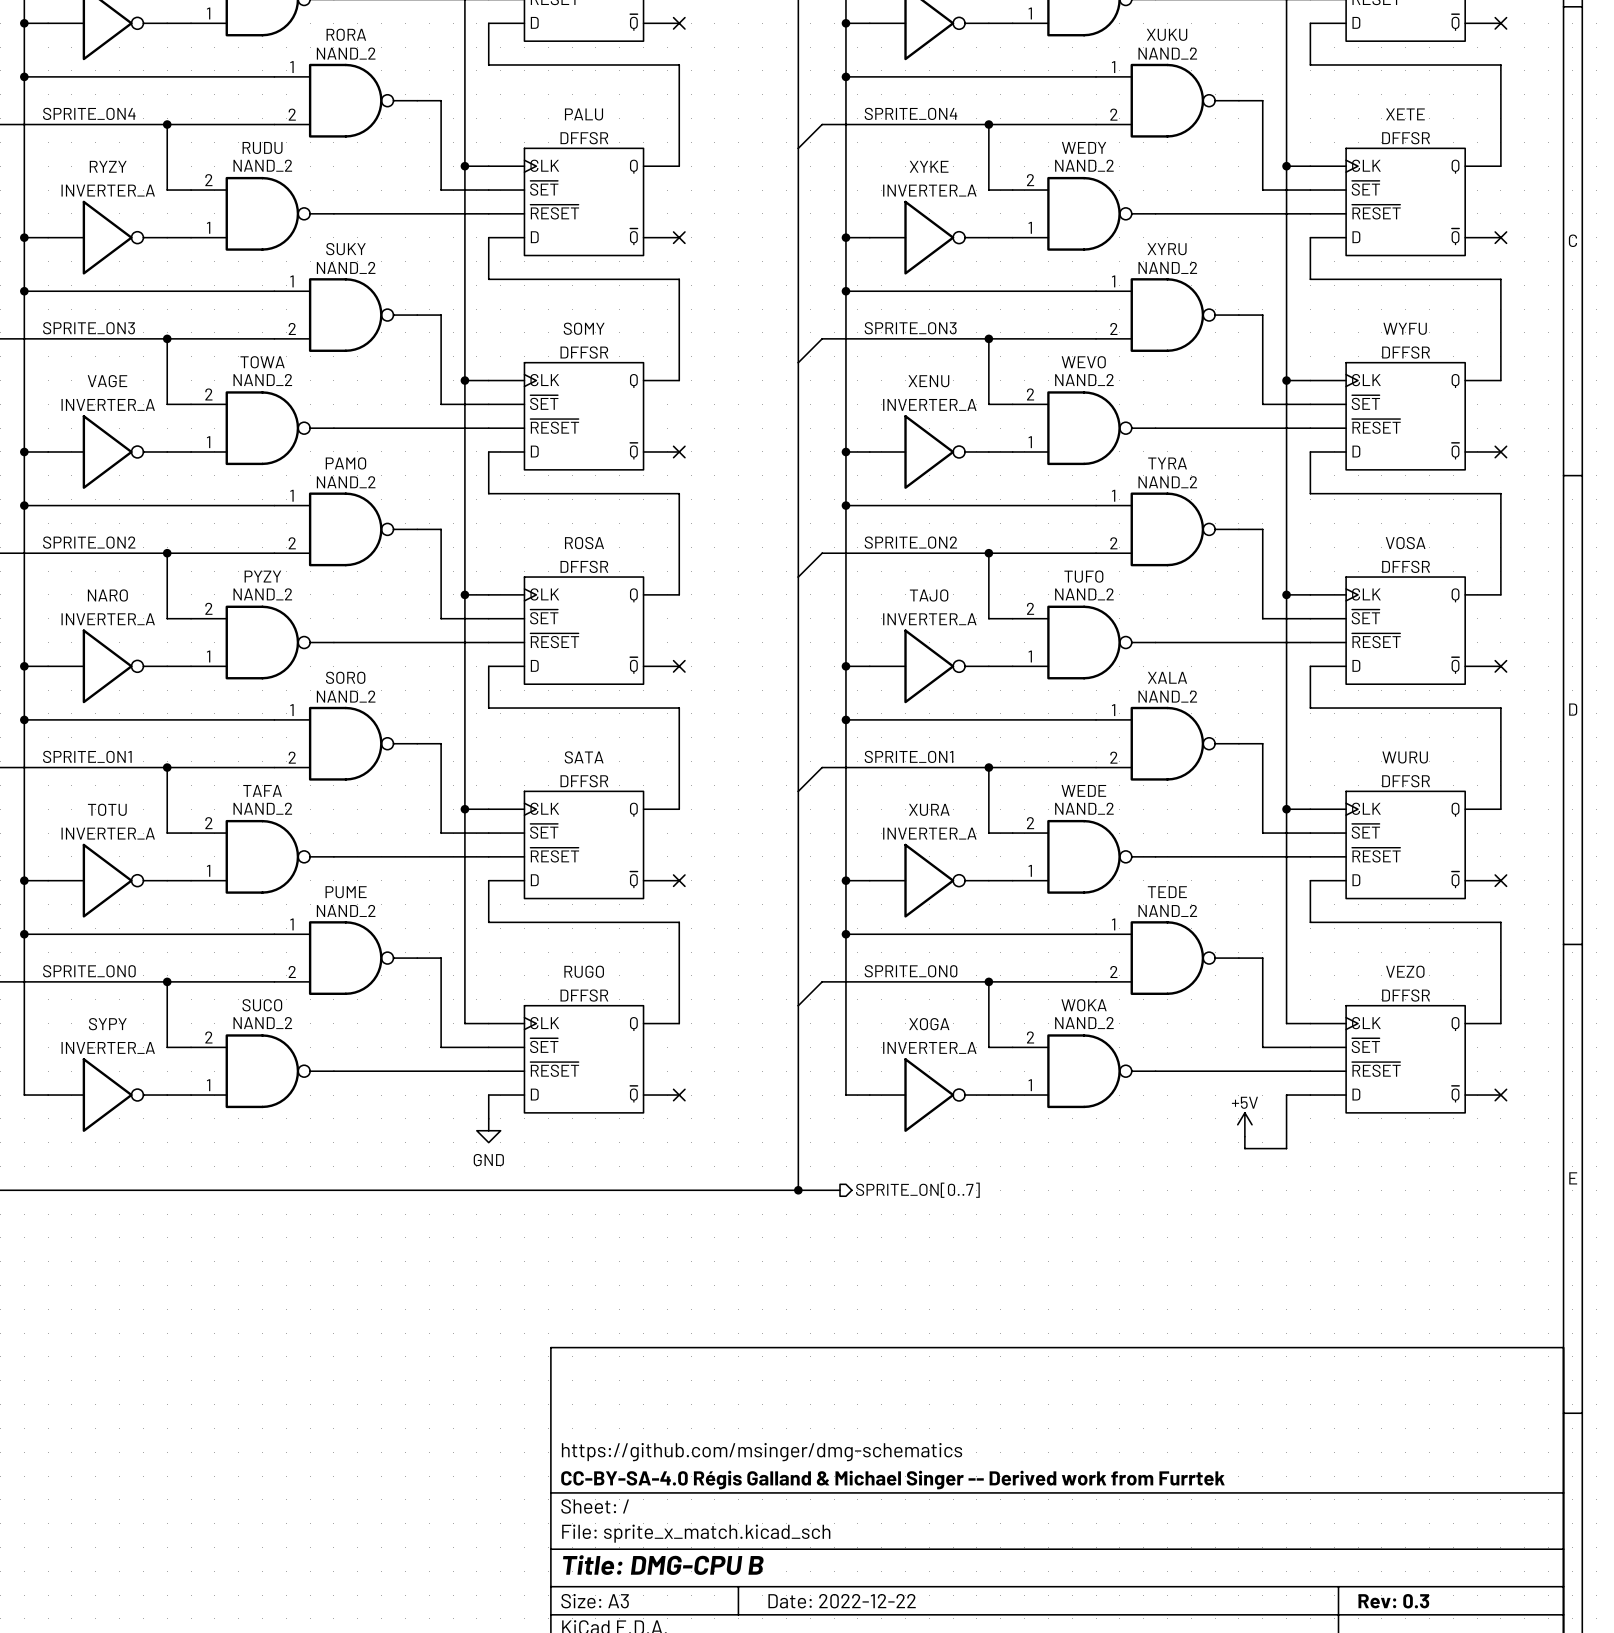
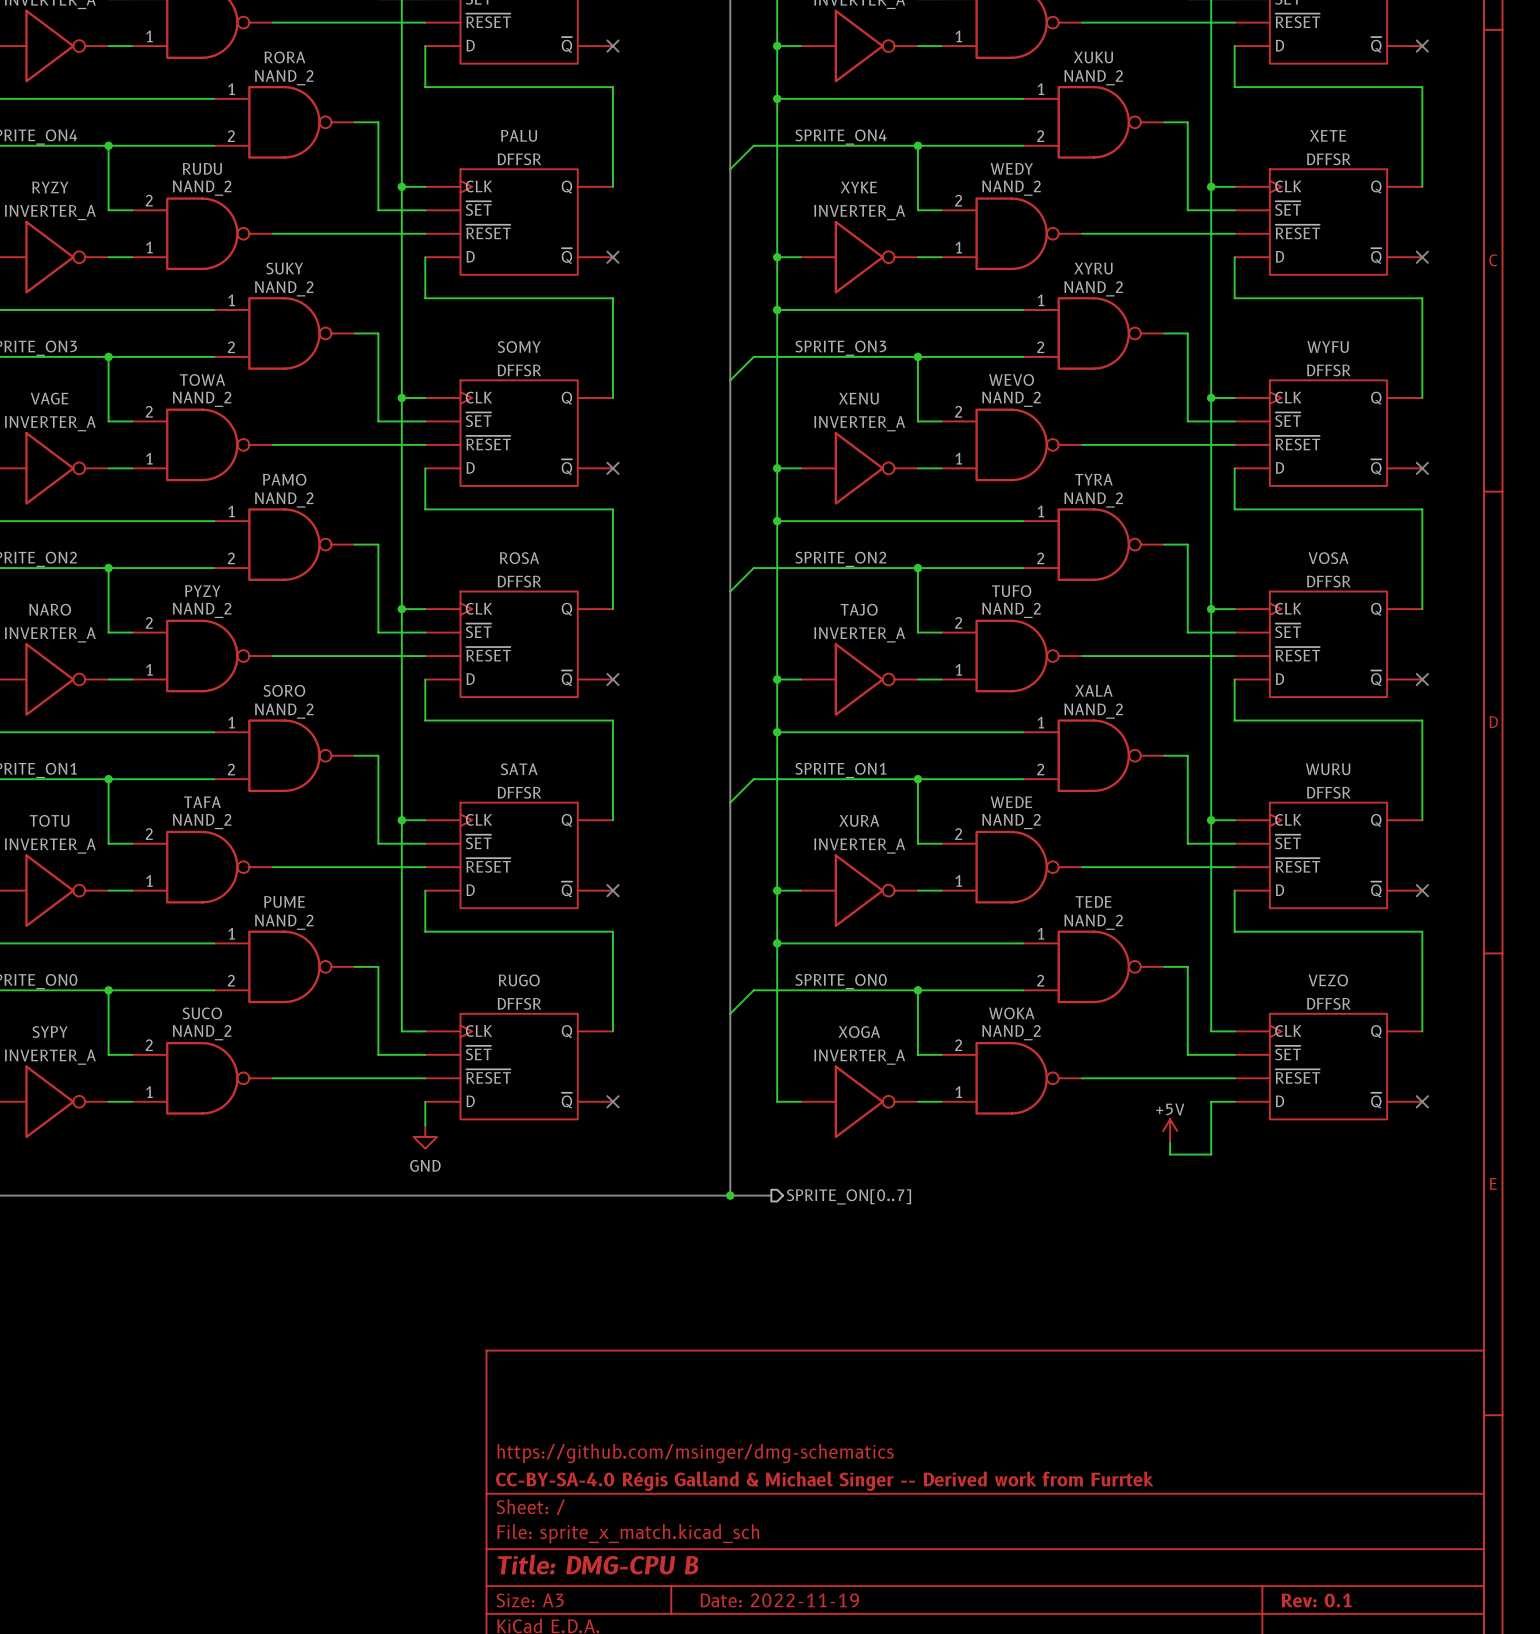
title block: Date: 2022-12-22 (842, 1601) -> Date: 2022-11-19 (779, 1600)
title block: Rev: 0.3 (1393, 1601) -> Rev: 0.1 (1316, 1600)

